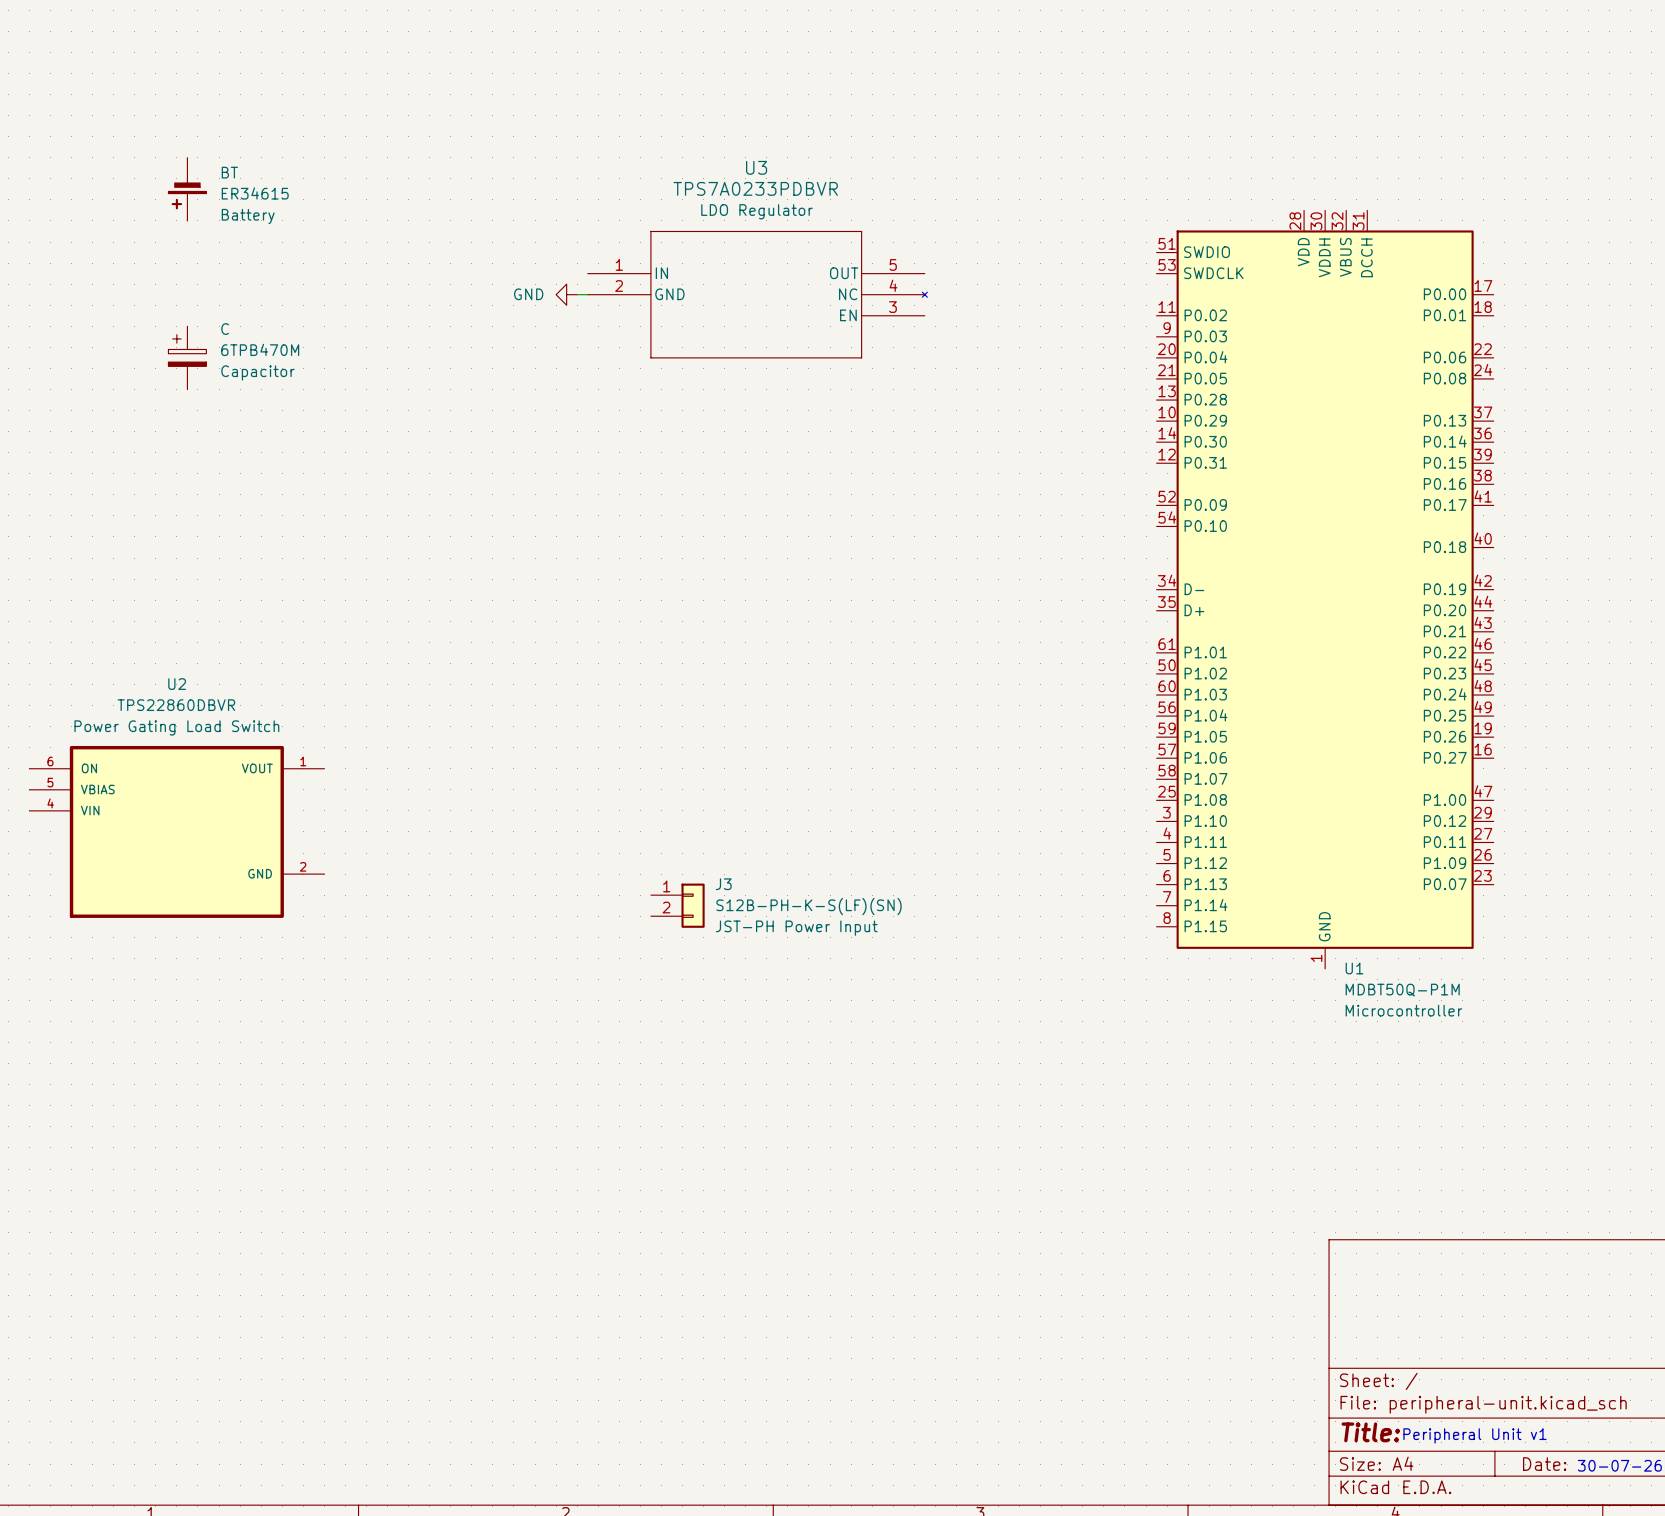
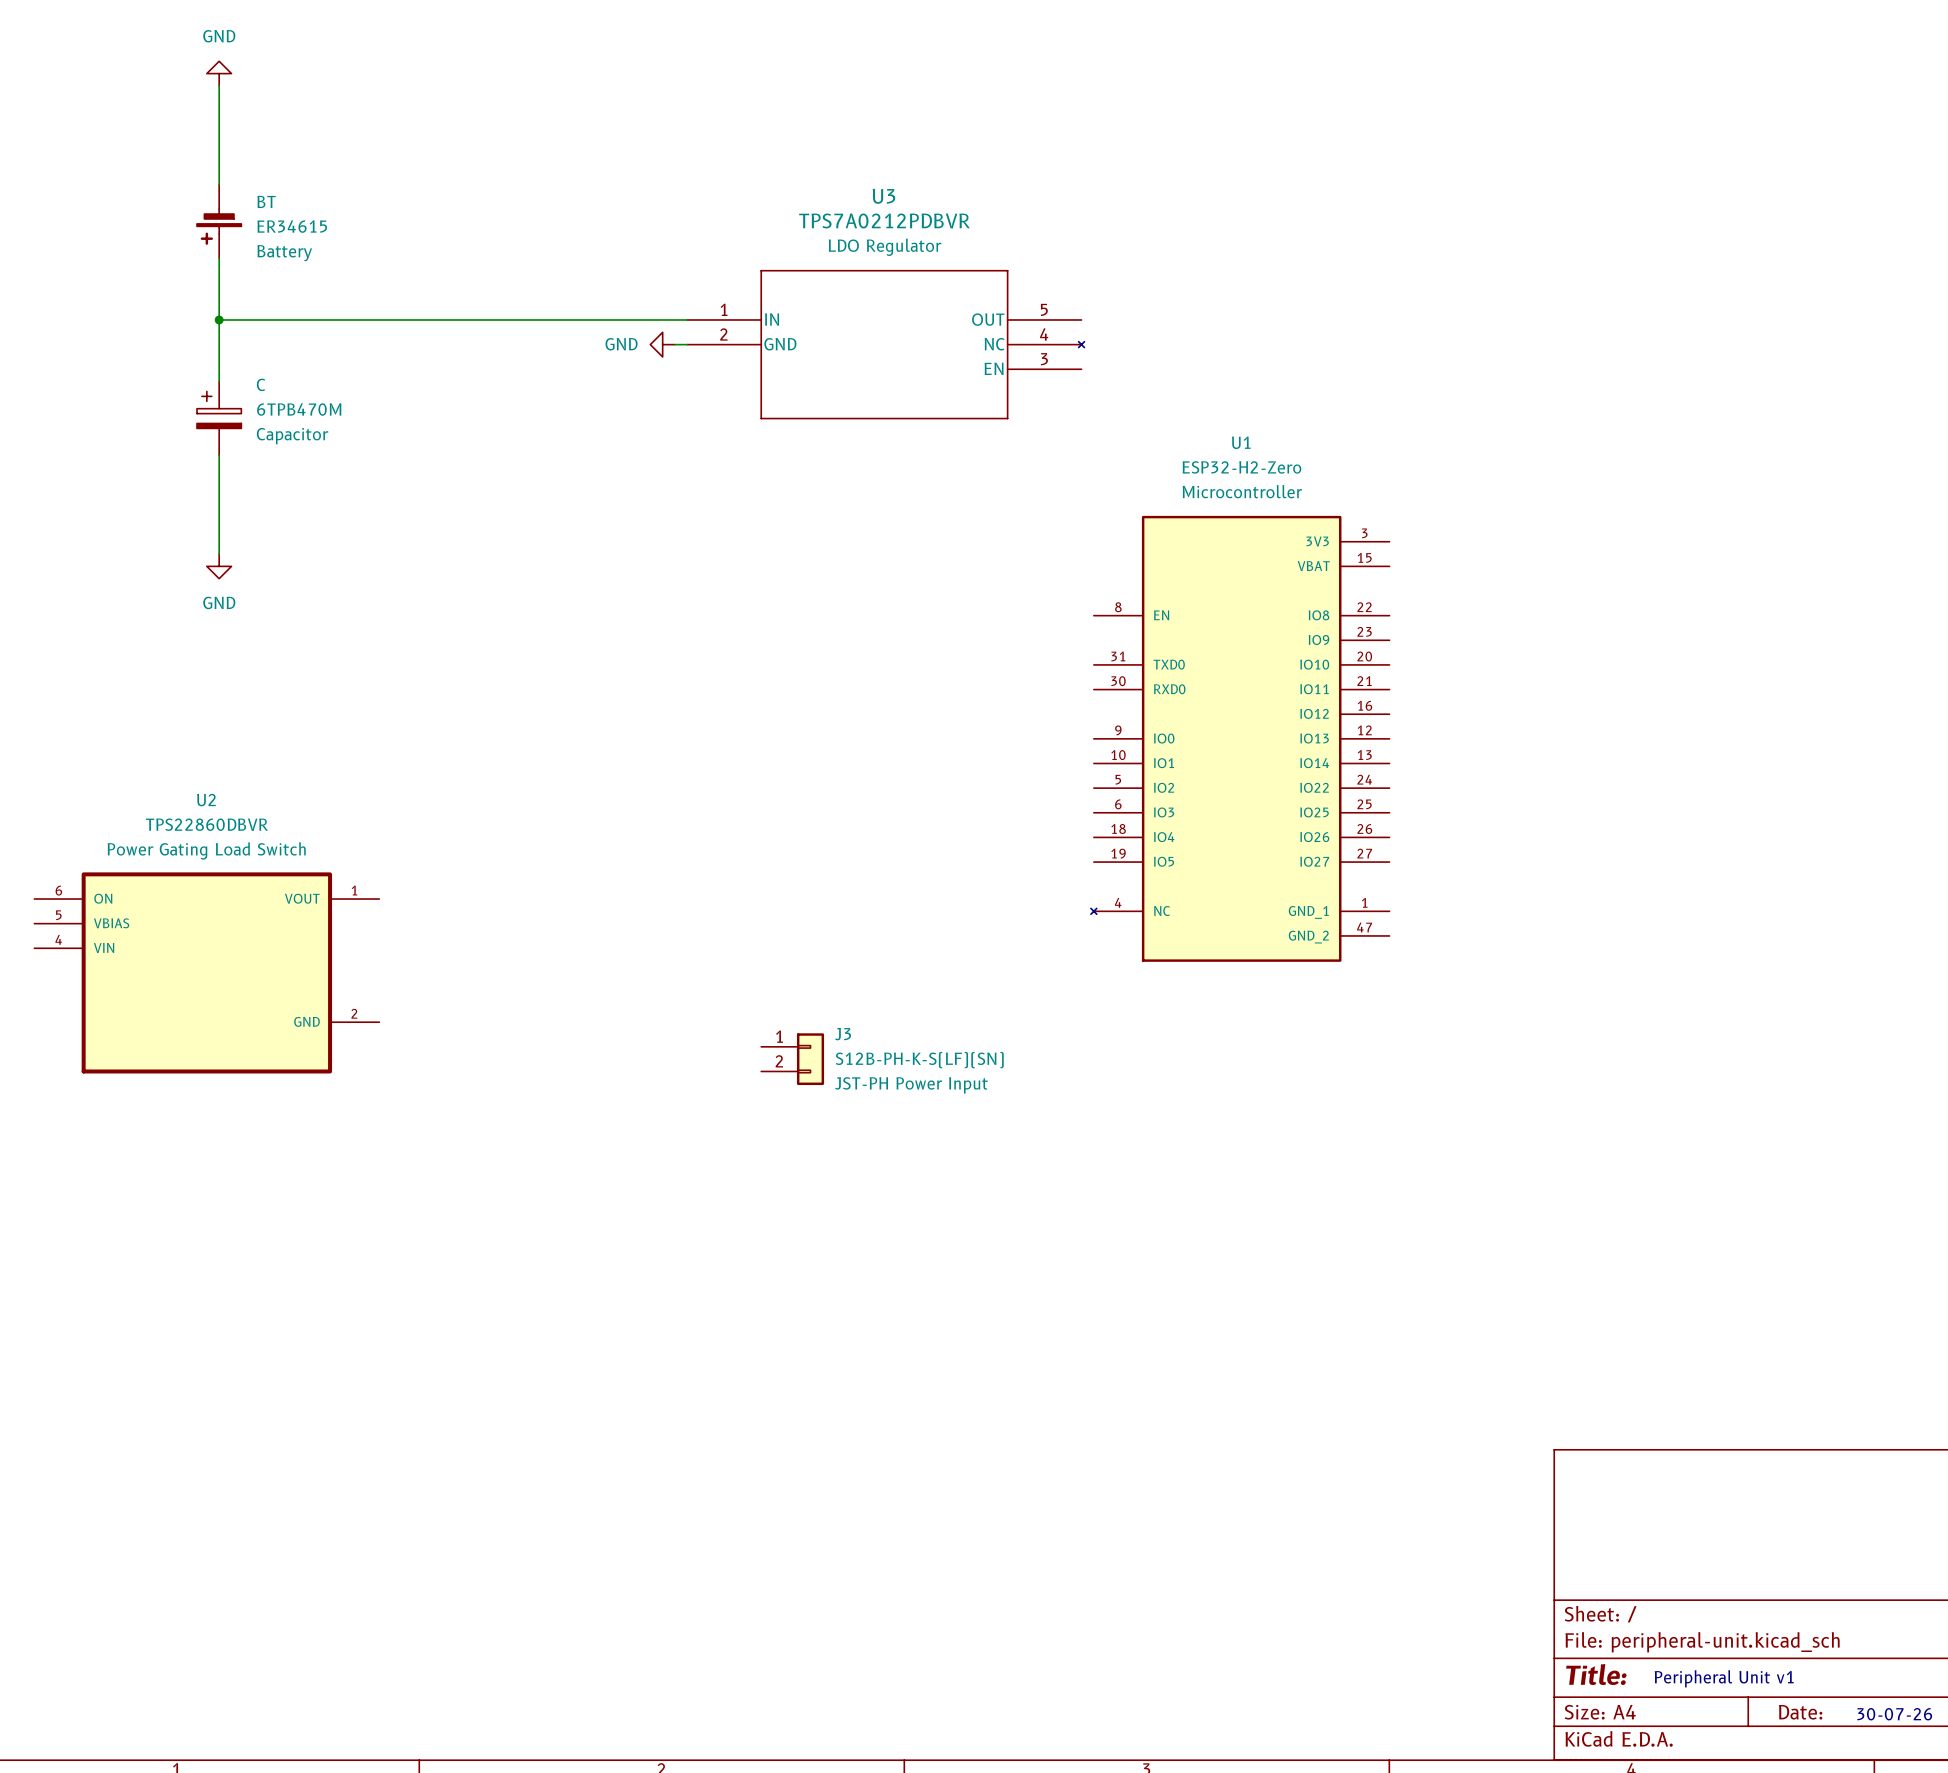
power symbol: none -> GND (219, 73)
wire: none -> (219, 85) (219, 184)
U3 value: TPS7A0233PDBVR (755, 188) -> TPS7A0212PDBVR (884, 220)
U1 symbol: [1156, 210, 1494, 969] -> [1090, 515, 1390, 962]
wire: none -> (219, 258) (219, 381)
wire: none -> (219, 319) (687, 319)
junction: none -> (219, 319)
wire: none -> (219, 455) (219, 554)
power symbol: none -> GND (219, 566)
U1 name position: U1 (1354, 968) -> U1 (1241, 442)
U1 value: MDBT50Q-P1M (1402, 990) -> ESP32-H2-Zero (1241, 467)
U1 text position: Microcontroller (1403, 1010) -> Microcontroller (1242, 491)

